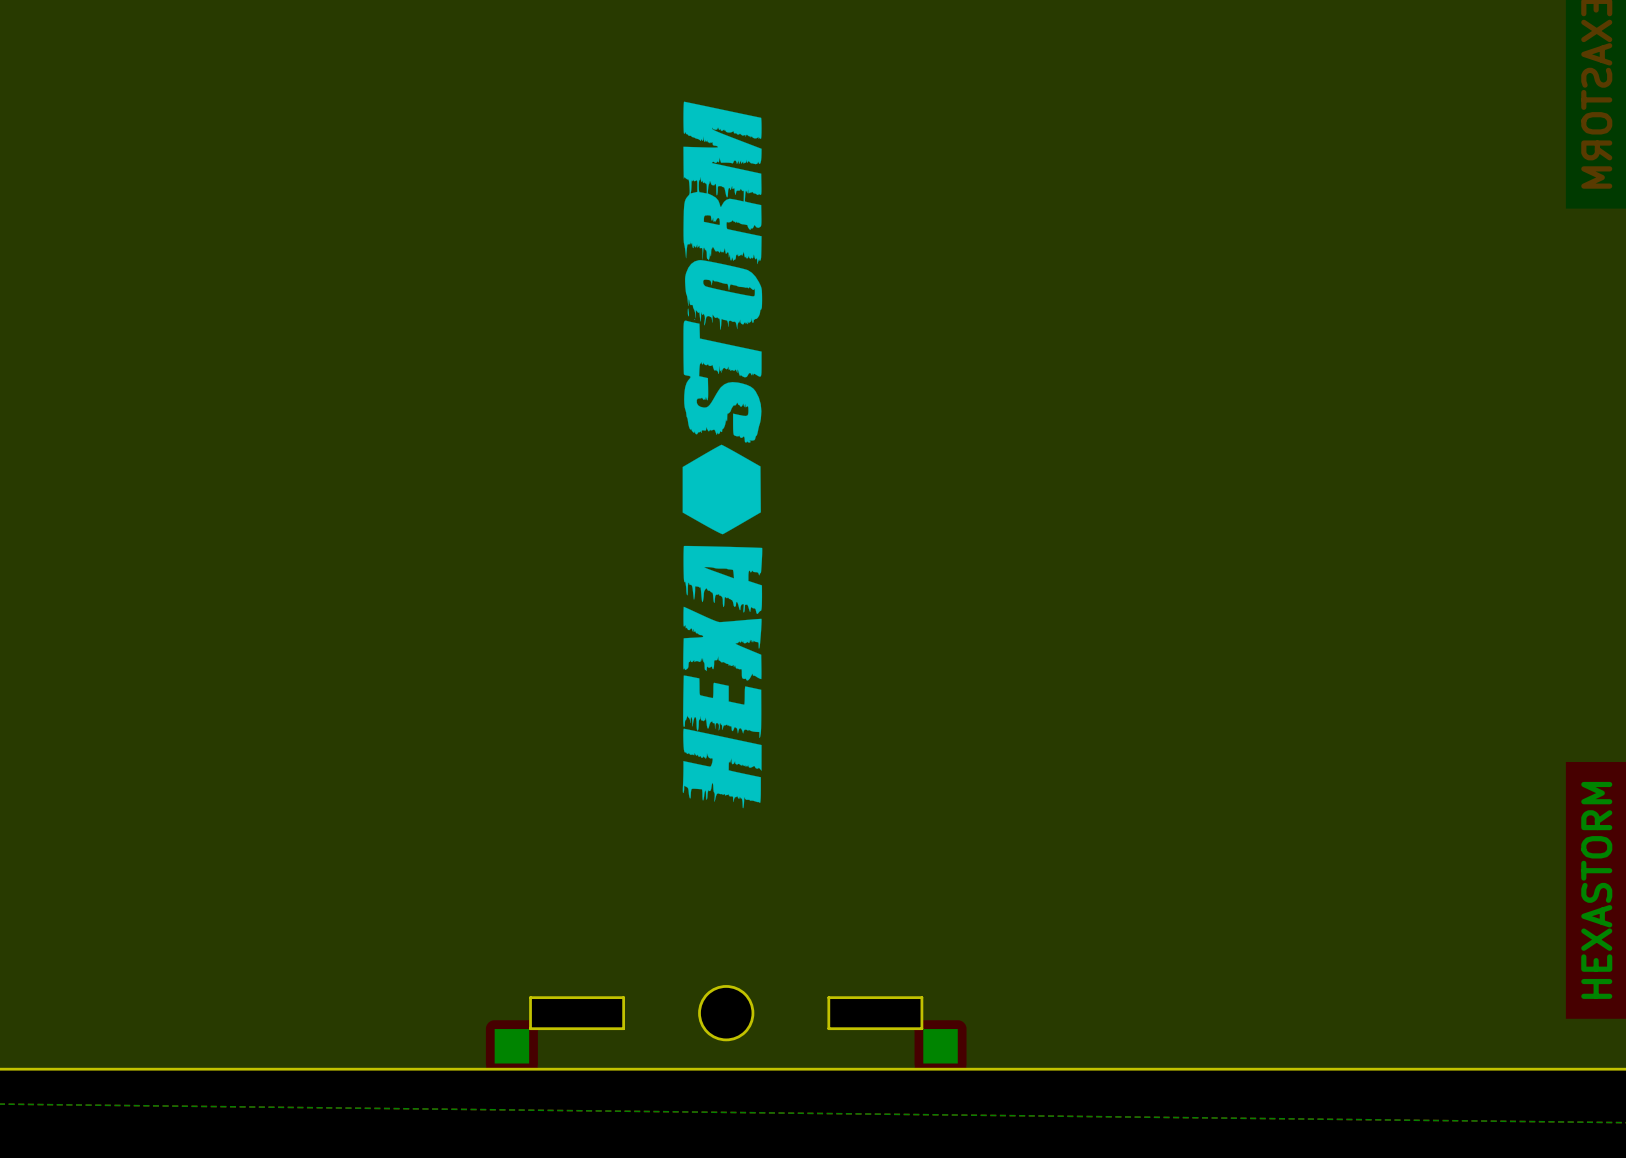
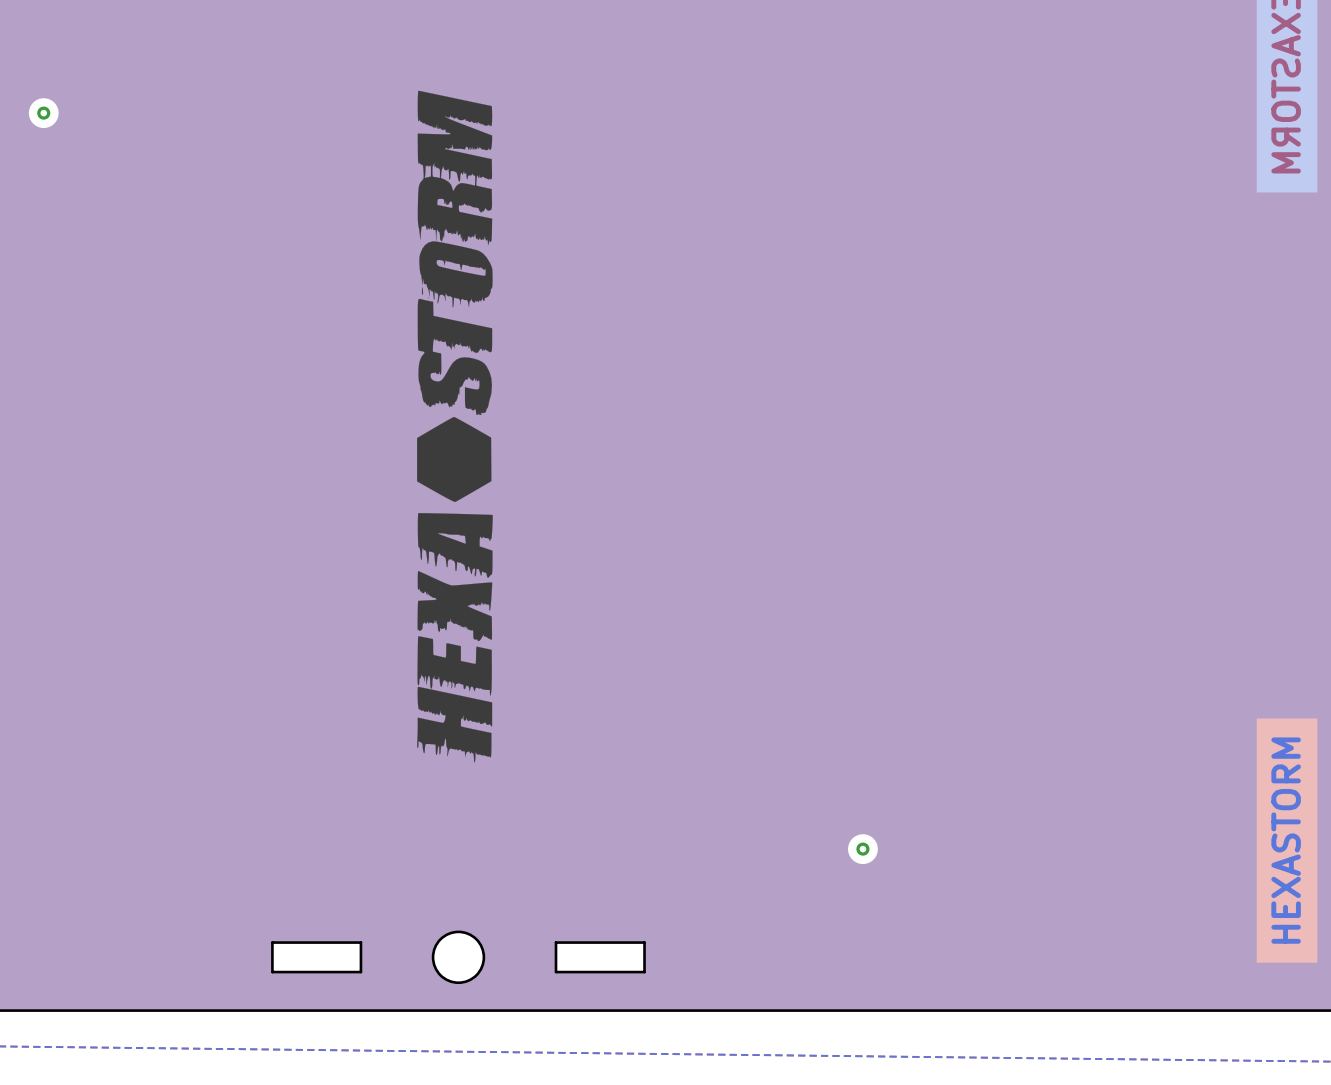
via: none -> (43, 113)
via: none -> (862, 849)
part: (511, 1046) -> none
part: (940, 1046) -> none

